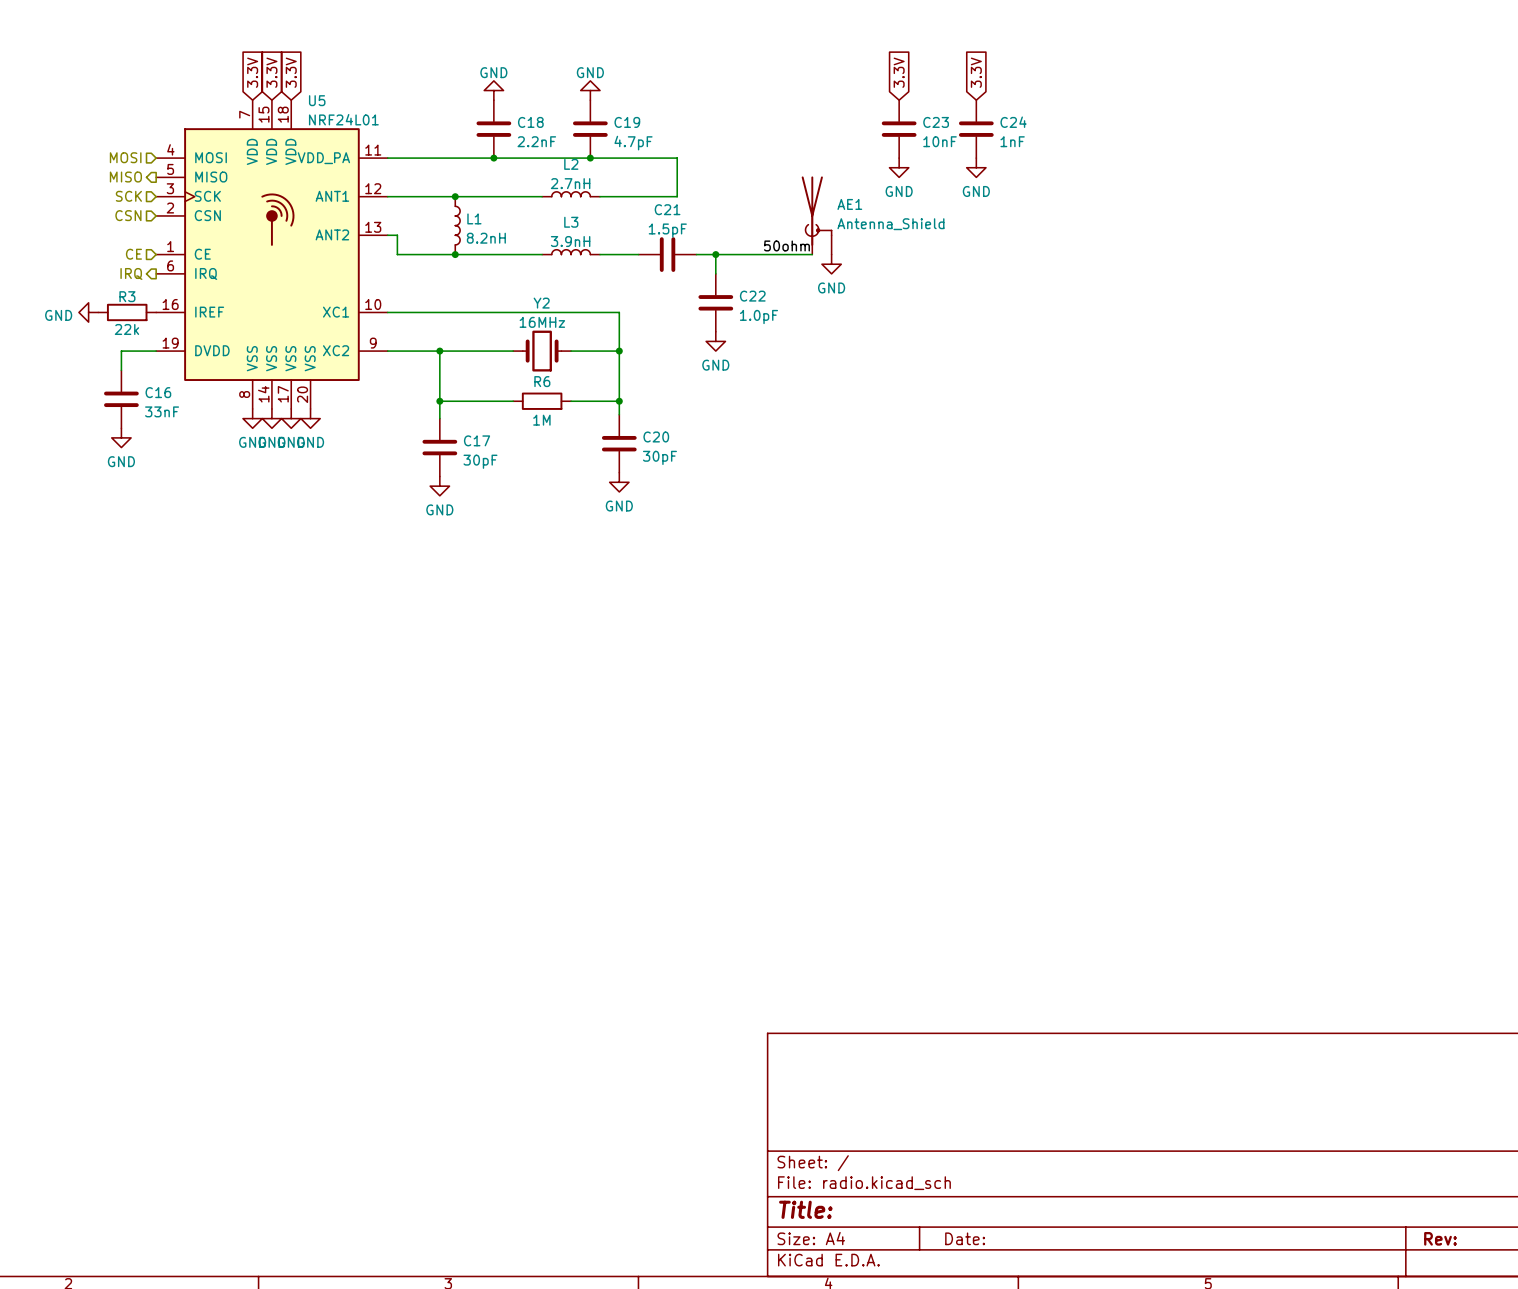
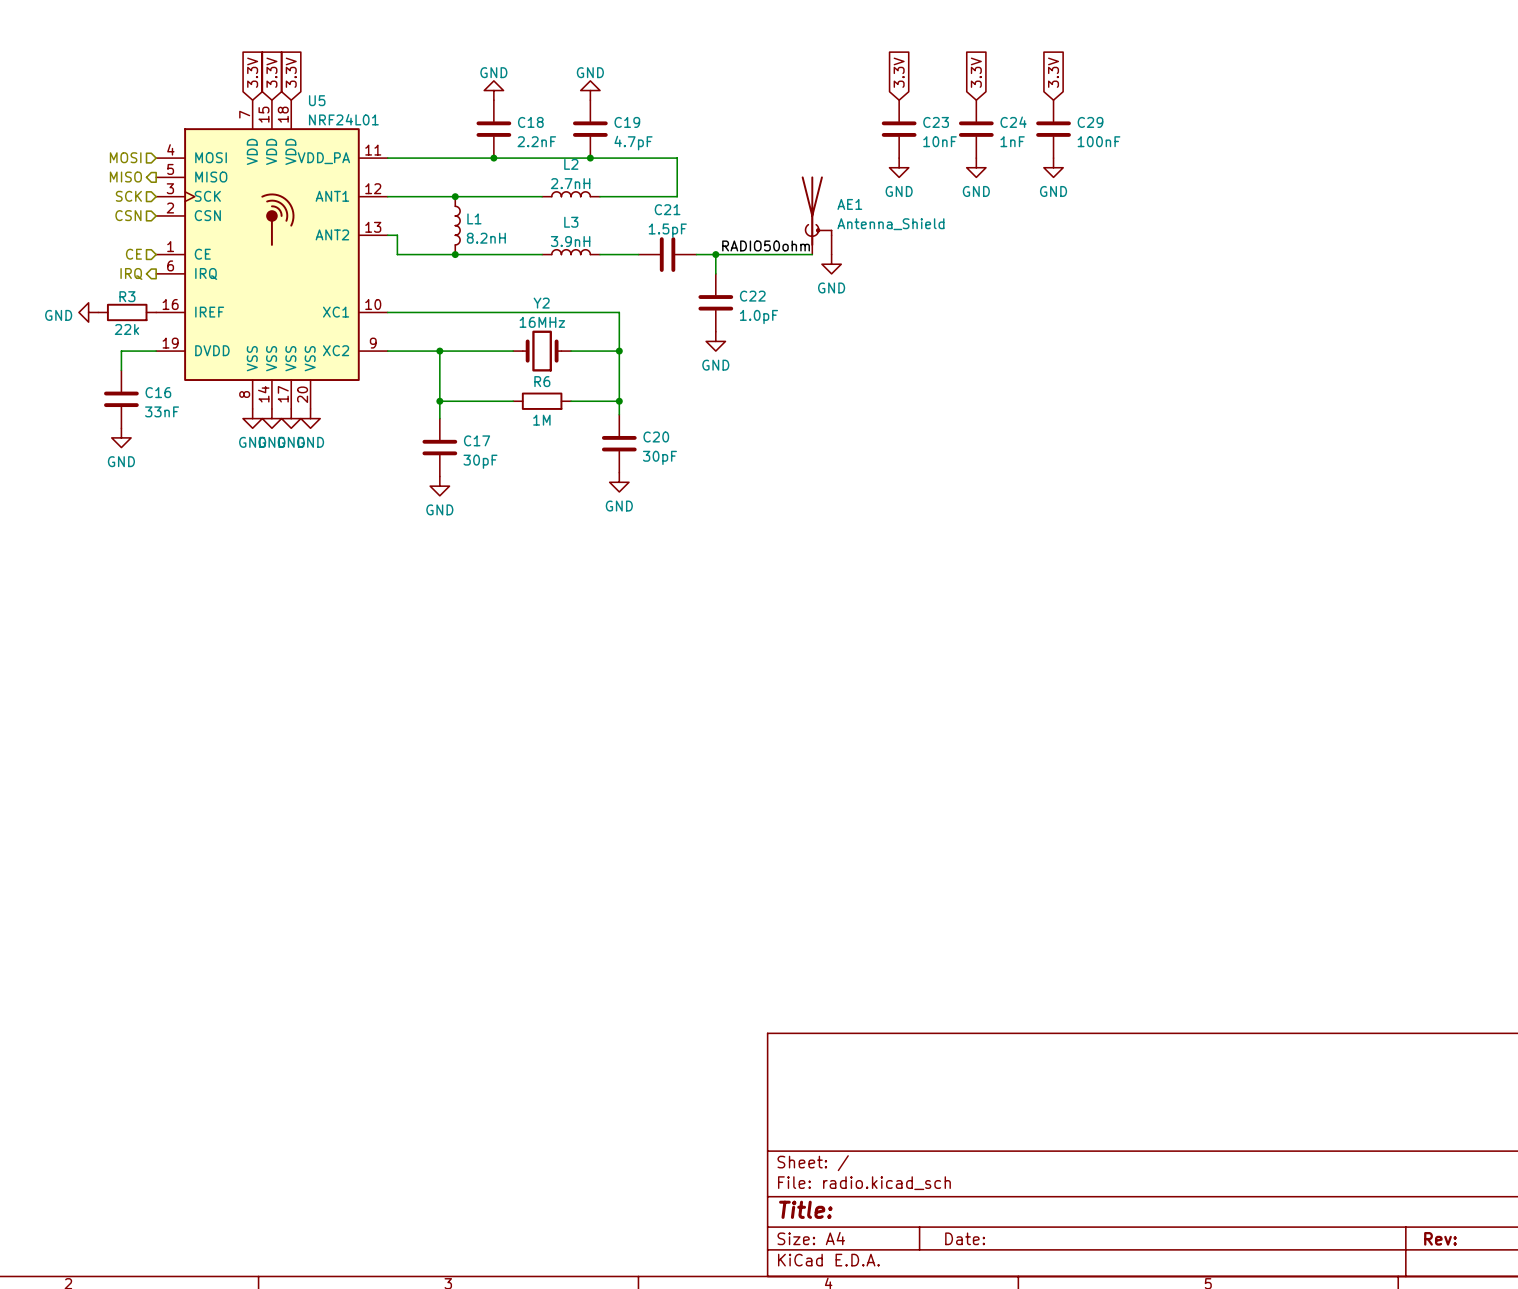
global label: none -> 3.3V (1053, 72)
C29: none -> 100nF (1053, 129)
power symbol: none -> GND (1053, 167)
label: 50ohm (786, 245) -> RADIO50ohm (766, 245)

